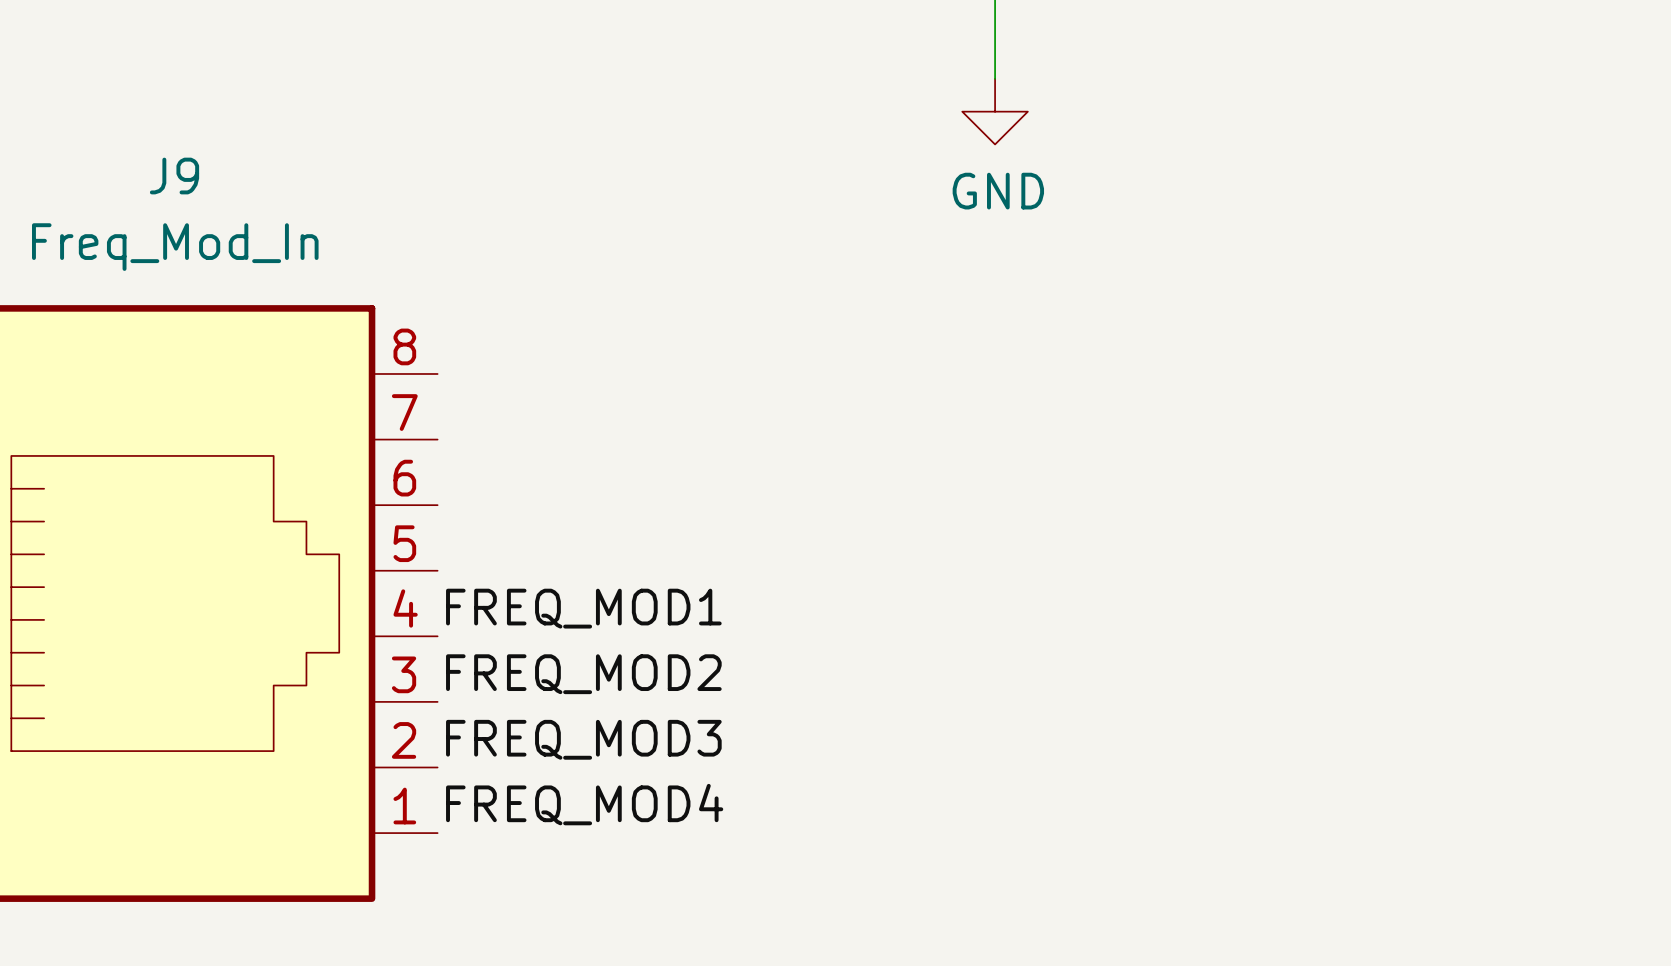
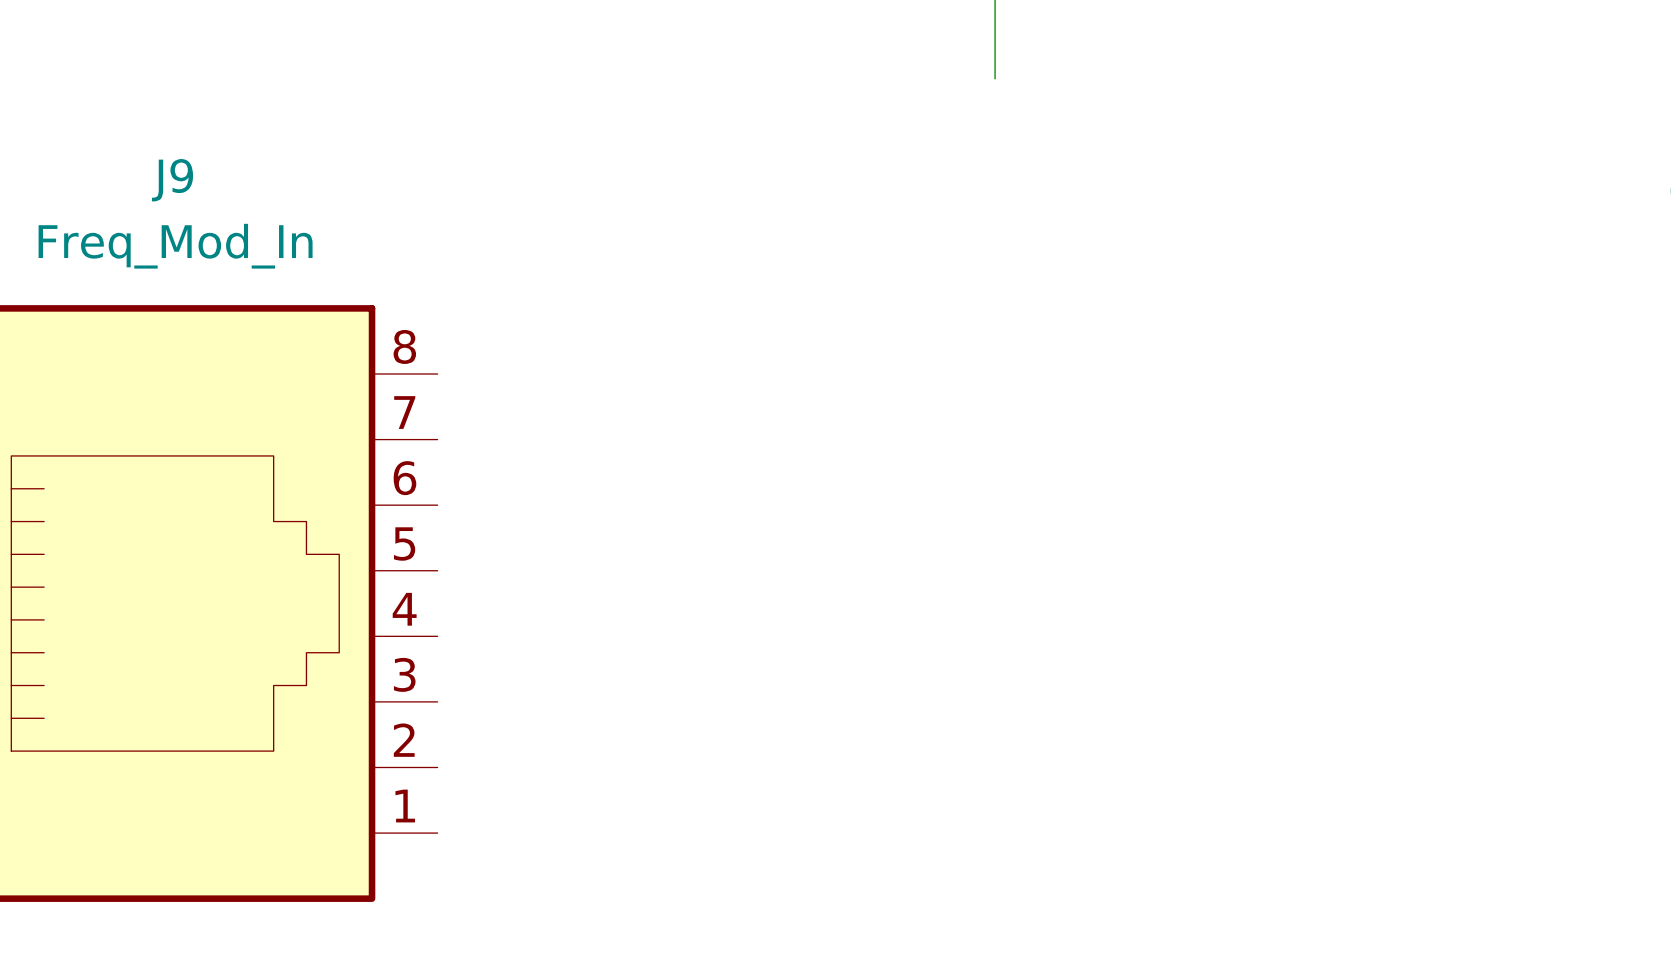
power symbol: GND (995, 111) -> none
label: FREQ_MOD1 (583, 608) -> none
label: FREQ_MOD2 (583, 674) -> none
label: FREQ_MOD3 (583, 739) -> none
label: FREQ_MOD4 (584, 804) -> none

